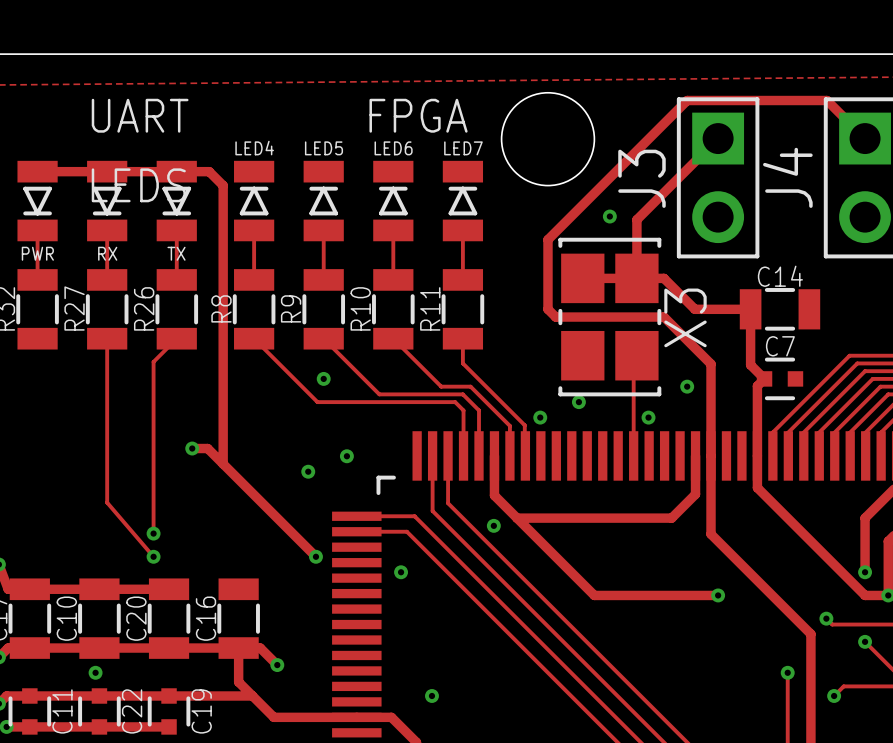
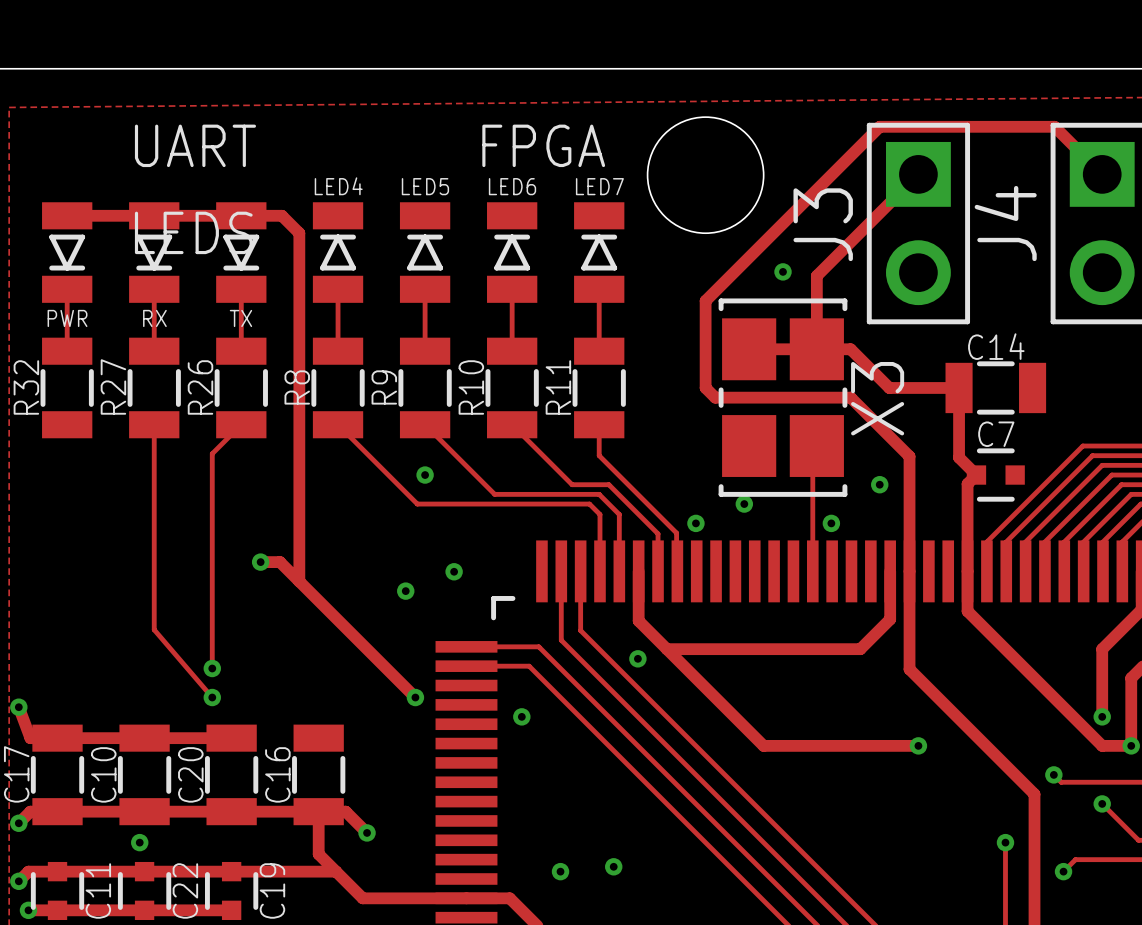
via: none -> (613, 866)

